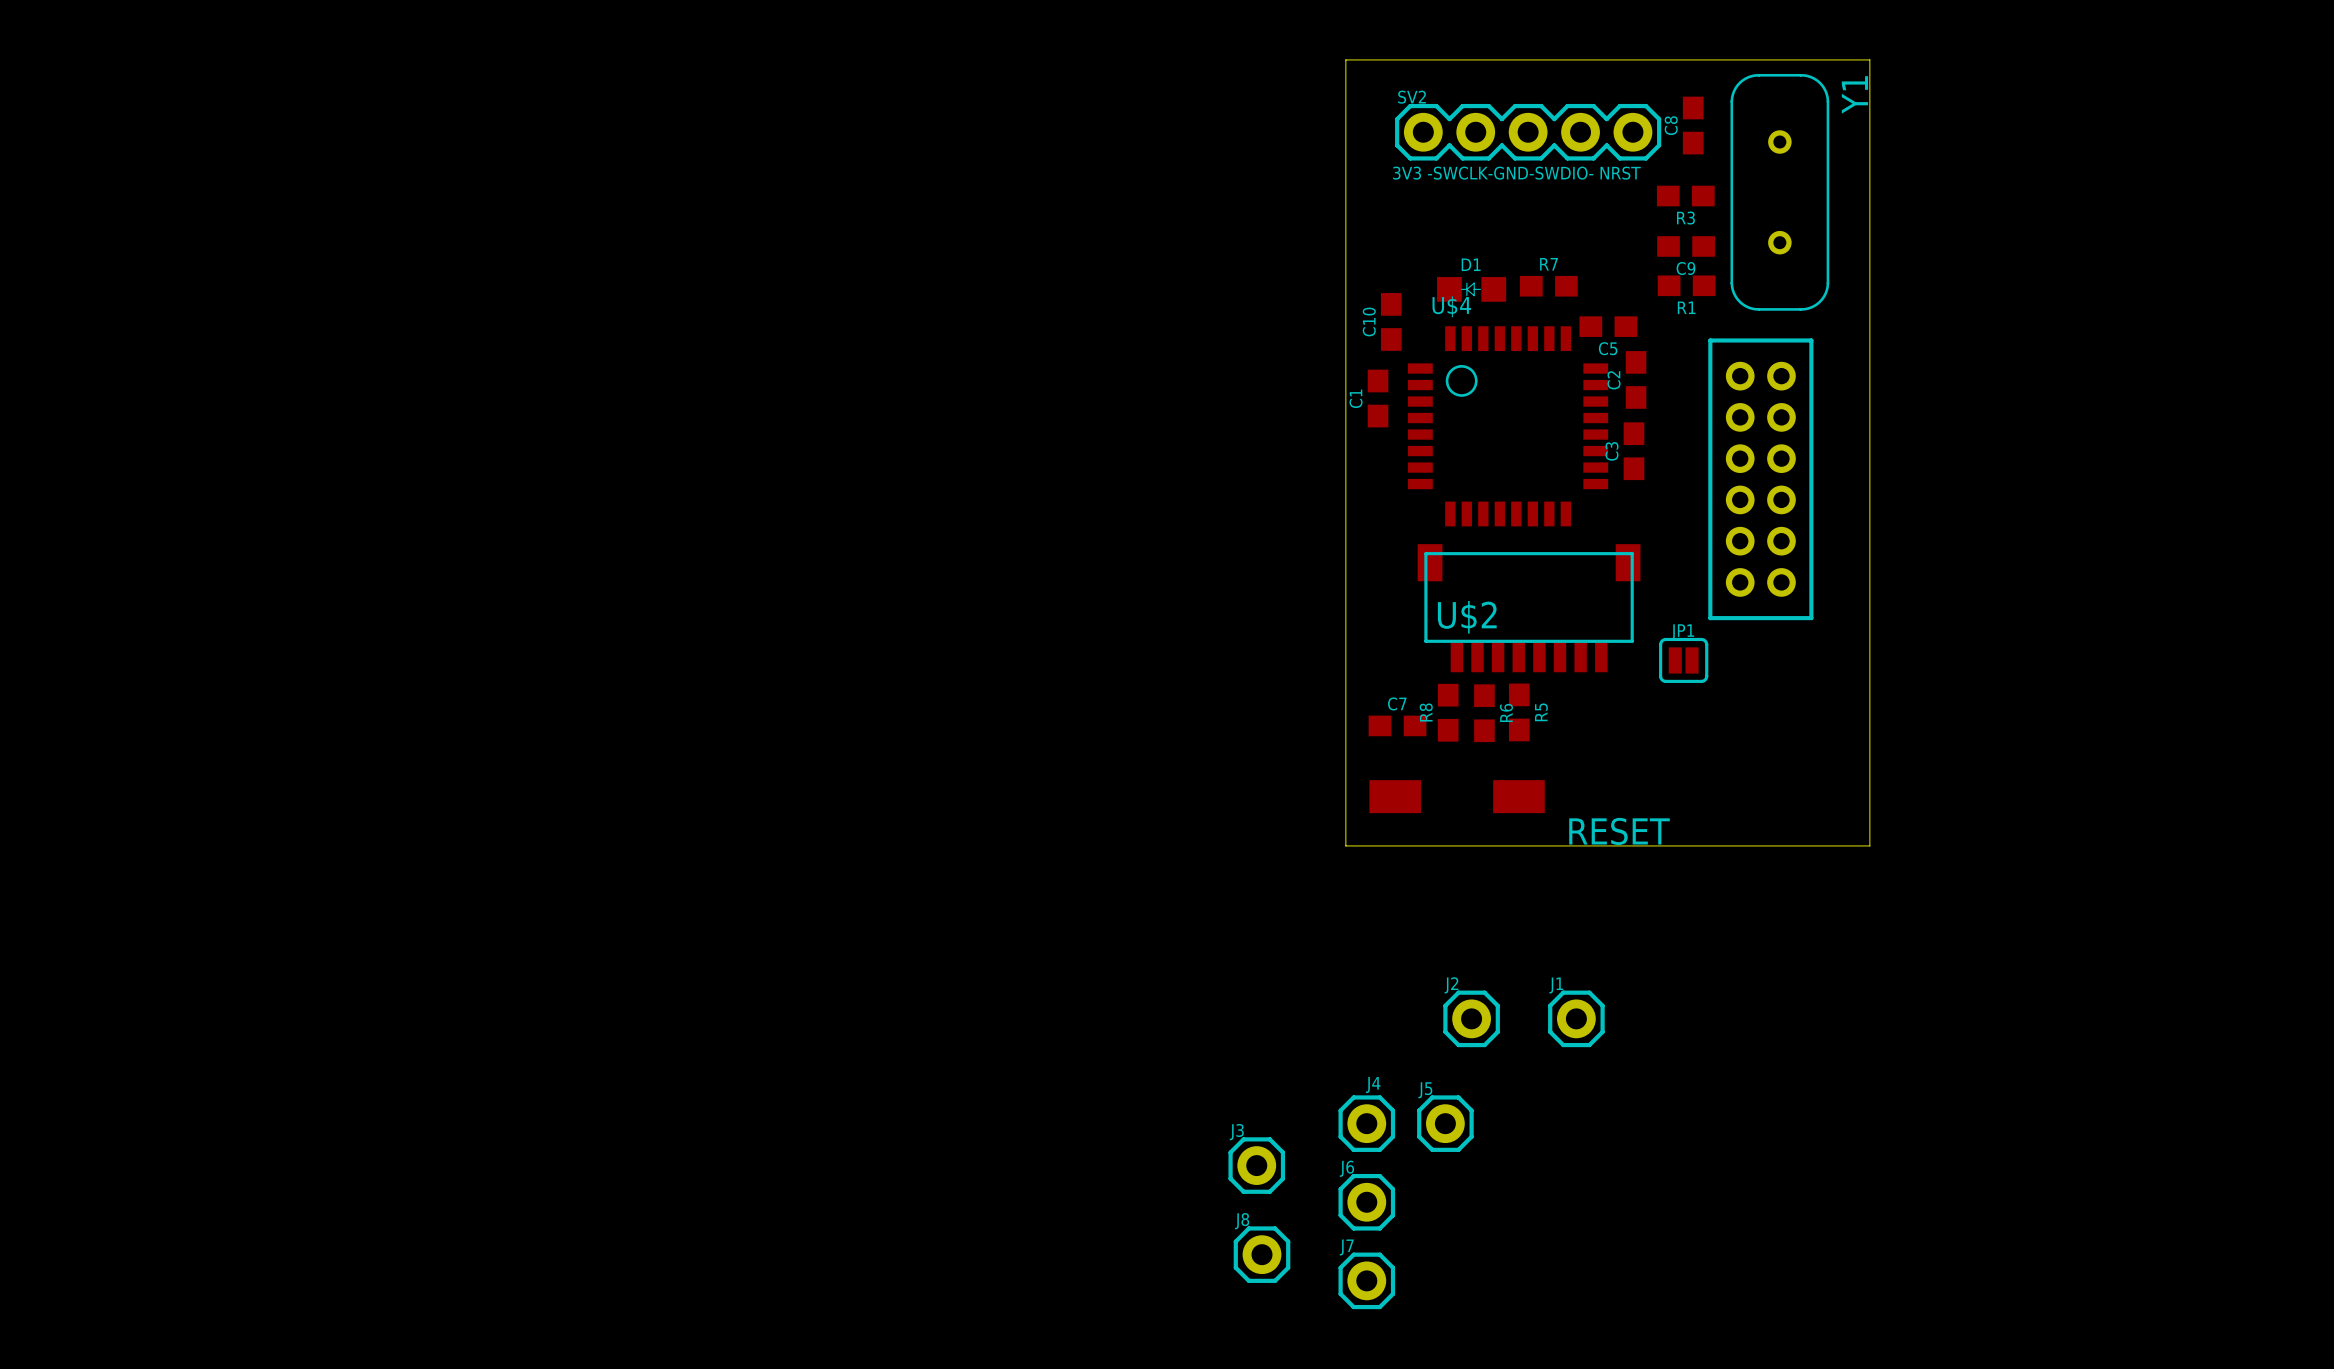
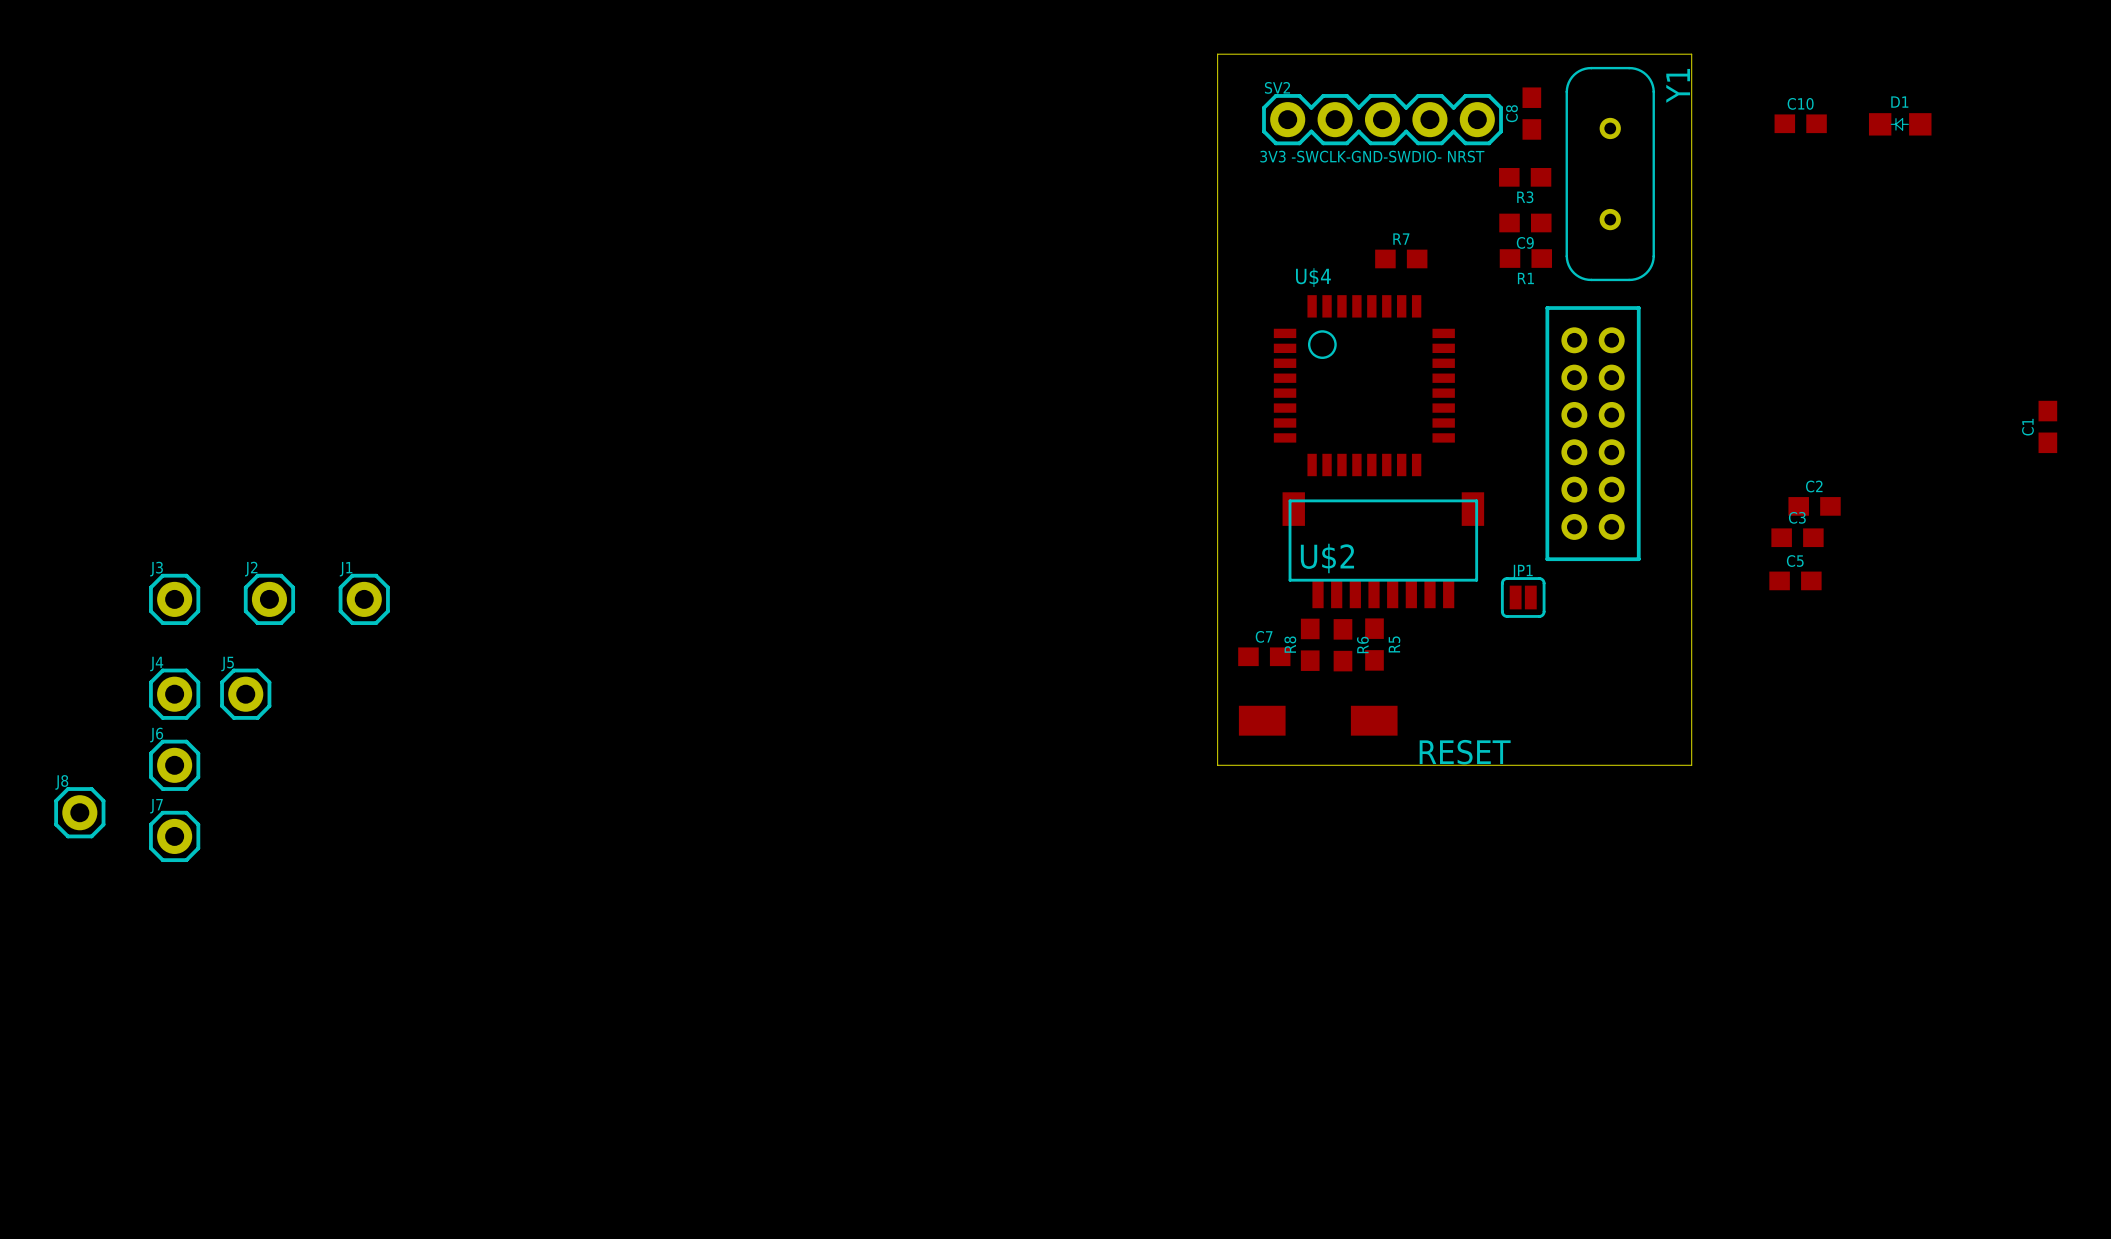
D1 position: (1471, 289) -> (1900, 124)
C10 rotation: 0° (1391, 321) -> 90° clockwise (1800, 123)
C10 position: (1391, 321) -> (1800, 123)
C5 position: (1608, 326) -> (1795, 580)
C5 name position: C5 (1608, 348) -> C5 (1795, 561)
C2 rotation: 0° (1636, 379) -> 90° clockwise (1814, 506)
C2 position: (1636, 379) -> (1814, 506)
C1 position: (1378, 398) -> (2047, 426)
C3 rotation: 0° (1633, 451) -> 90° clockwise (1797, 537)
C3 position: (1633, 451) -> (1797, 537)
J2 position: (1471, 1018) -> (269, 599)
J1 position: (1576, 1018) -> (364, 599)
J4 name position: J4 (1373, 1085) -> J4 (156, 664)
J4 position: (1366, 1123) -> (174, 694)
J5 position: (1445, 1123) -> (245, 694)
J3 position: (1256, 1165) -> (174, 599)
J6 position: (1366, 1202) -> (174, 765)
J8 position: (1262, 1254) -> (79, 812)
J7 position: (1366, 1280) -> (174, 836)

